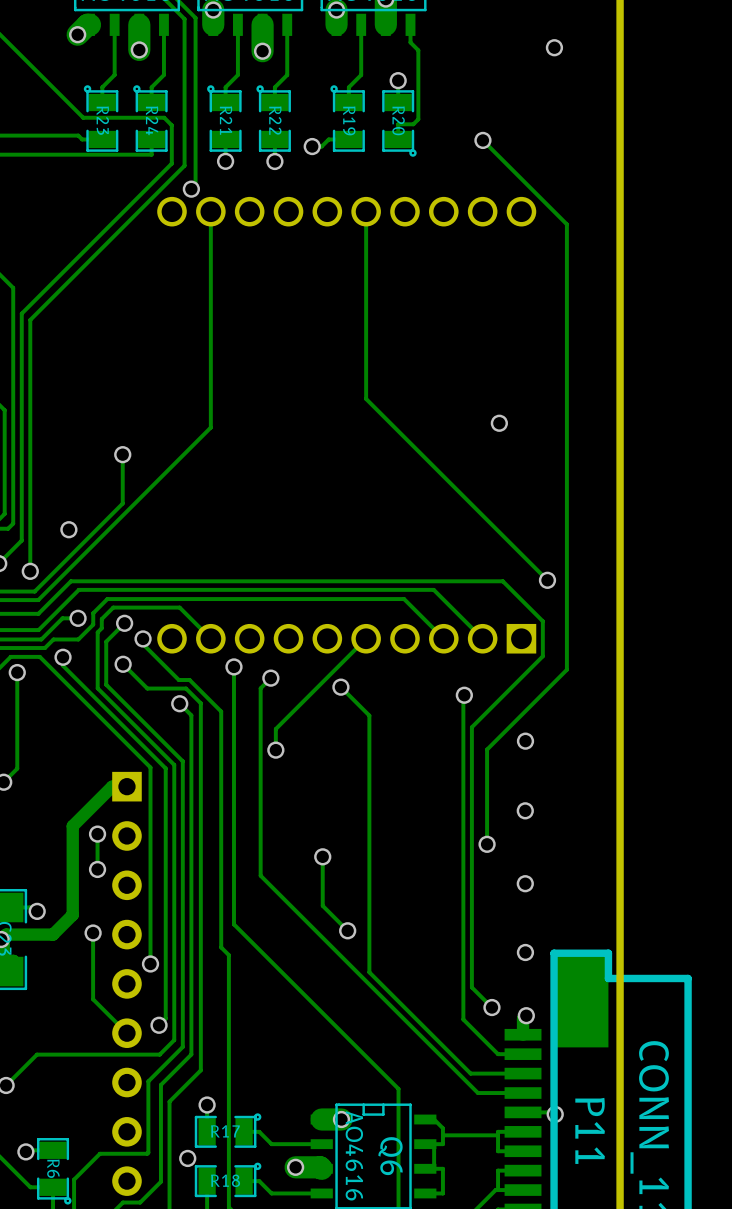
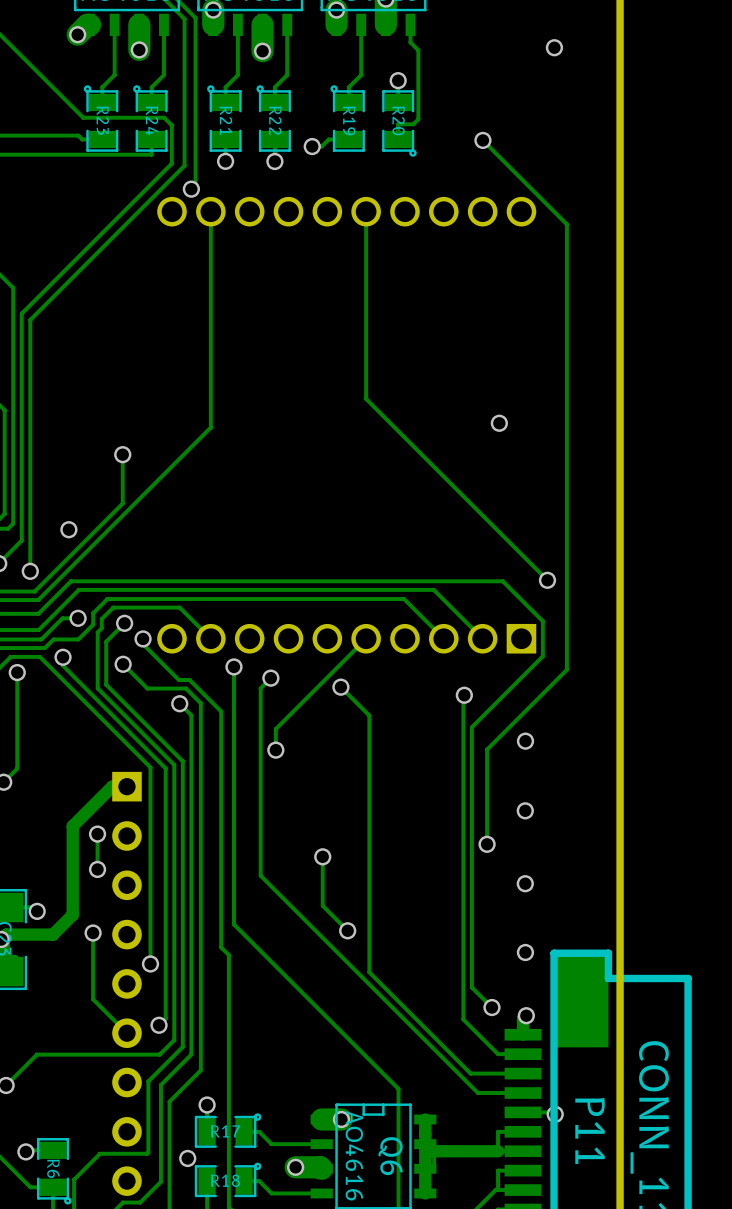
track: (425, 1119) (434, 1119) (442, 1128) (442, 1144) (425, 1144) -> (498, 1151) (432, 1151) (425, 1144)
track: (498, 1135) (442, 1135) -> none
track: (425, 1168) (442, 1168) (442, 1193) (425, 1193) -> (425, 1119) (425, 1193)

